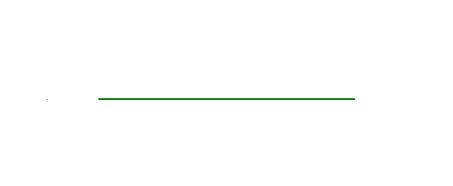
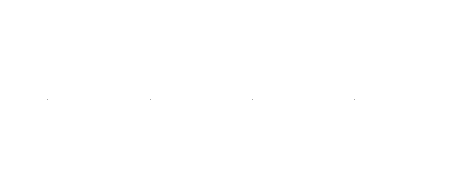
wire: (99, 99) (354, 99) -> none

